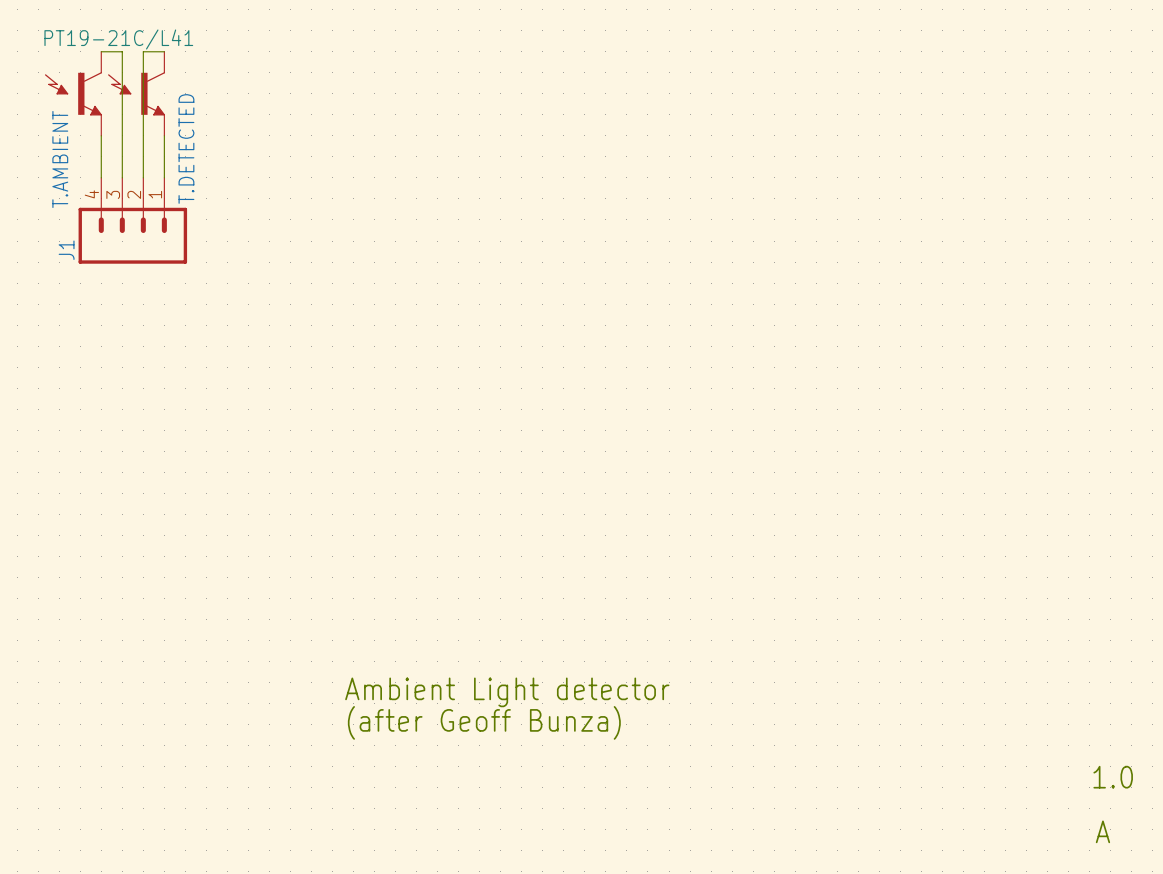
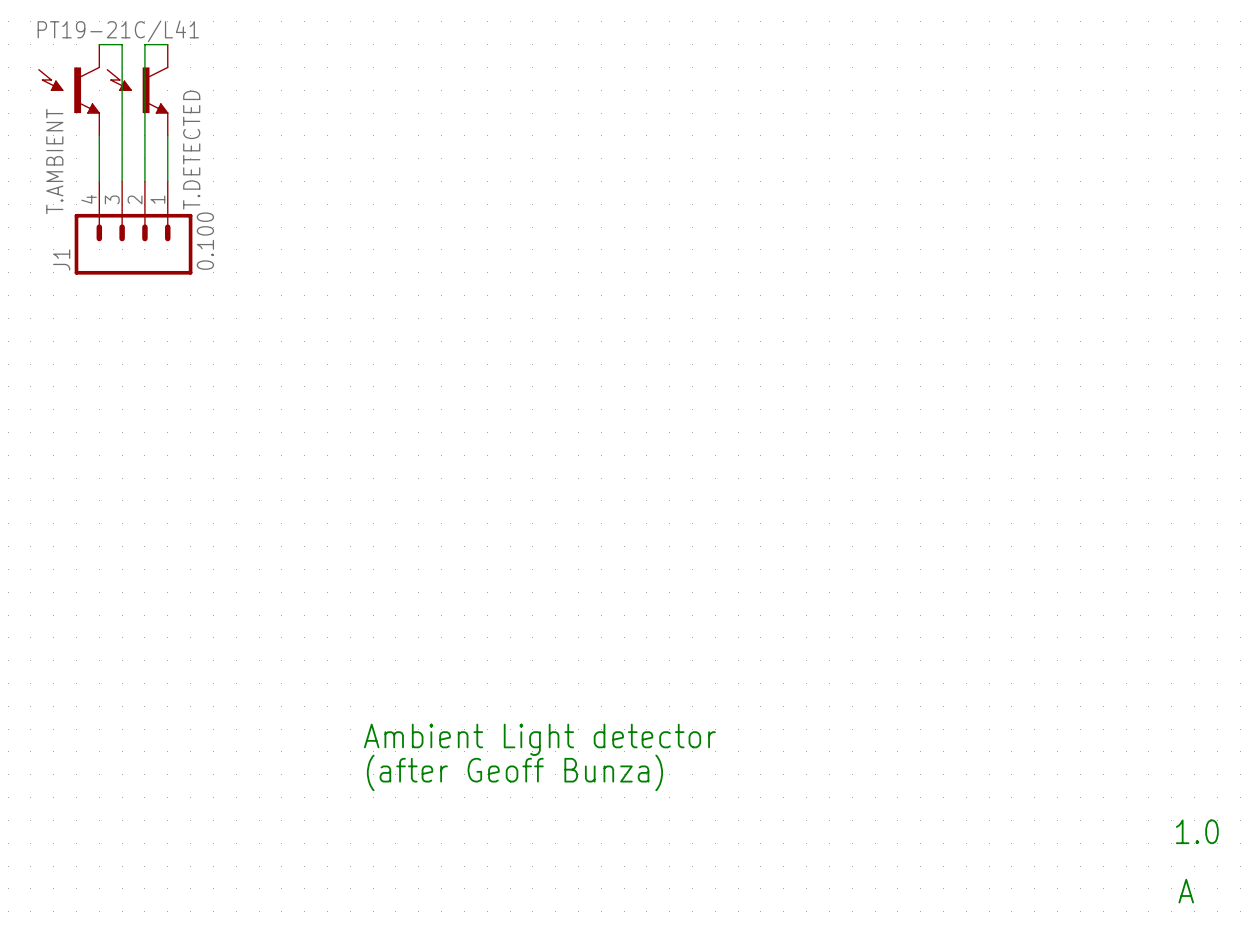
J1 value: none -> 0.100 (205, 241)

